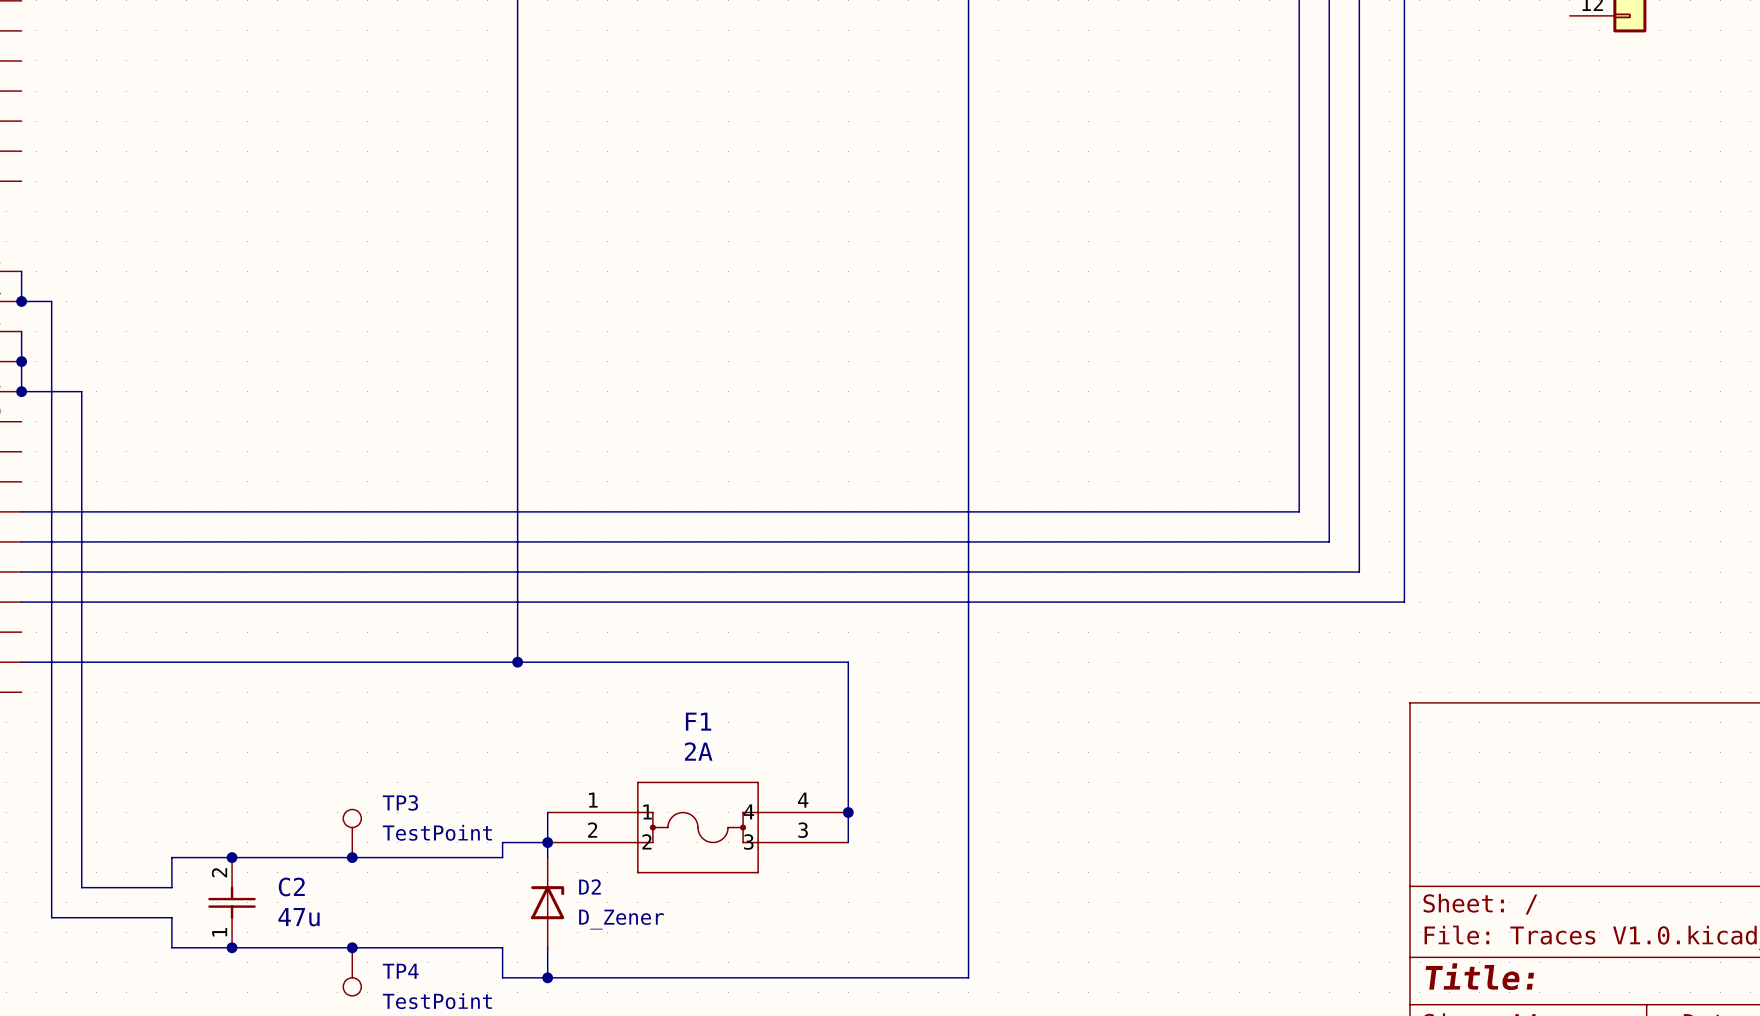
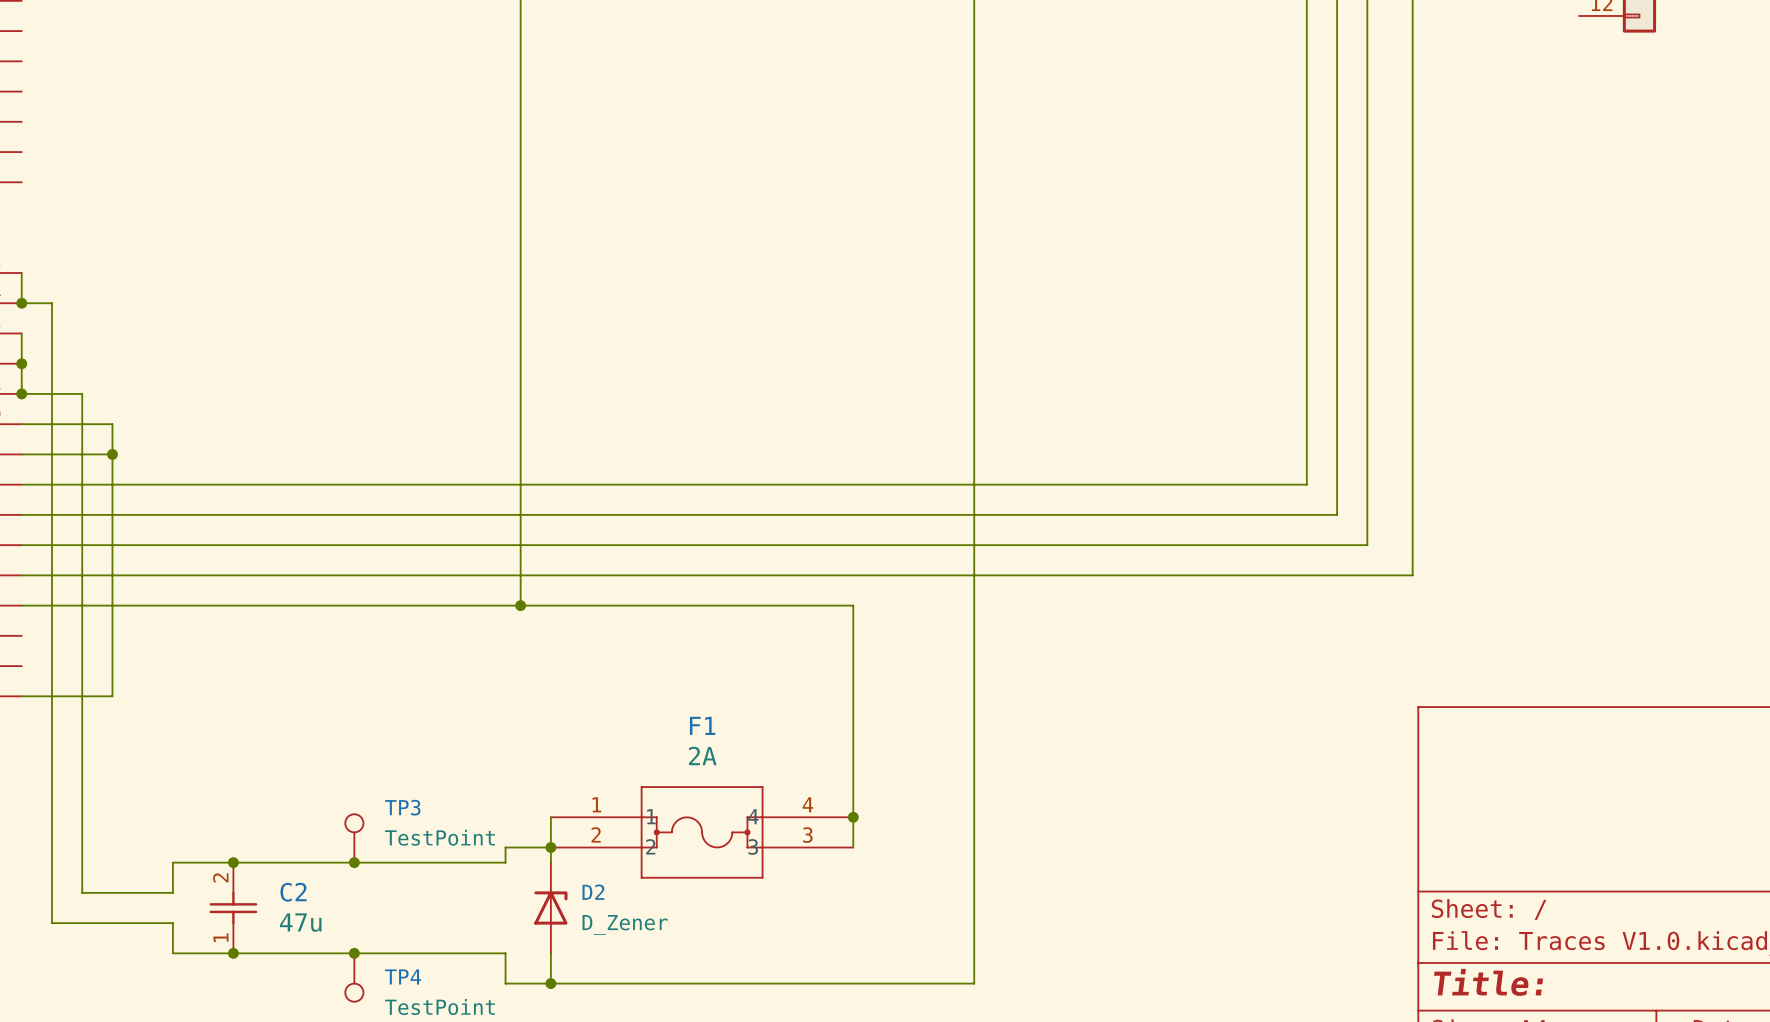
wire: none -> (21, 424) (112, 424) (112, 696) (21, 696)
wire: none -> (21, 454) (112, 454)
junction: none -> (112, 454)
wire: none -> (21, 484) (1306, 484)
wire: (1299, 481) (1299, 511) -> (1337, 514) (1306, 514)
wire: (1329, 511) (1329, 541) -> (1367, 545) (1337, 545)
wire: (1359, 541) (1359, 572) -> (1412, 575) (1367, 575)
wire: (1404, 572) (1404, 602) (848, 602) -> (853, 666) (853, 605)
wire: (517, 602) (517, 662) -> none
wire: (21, 662) (848, 662) -> none
junction position: (517, 662) -> (520, 605)

